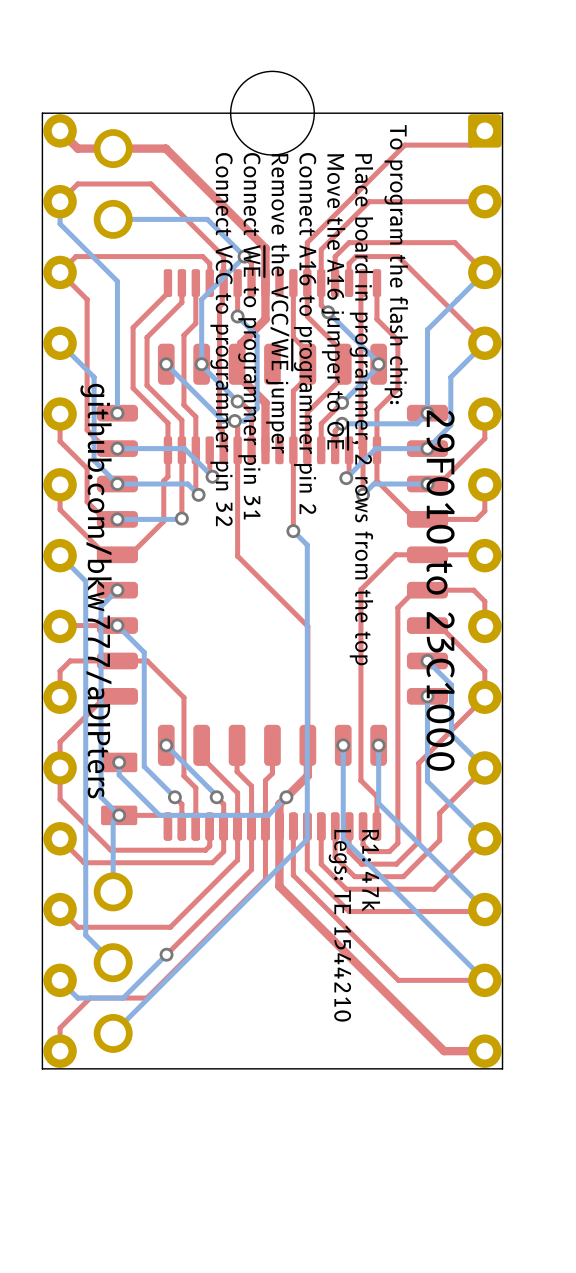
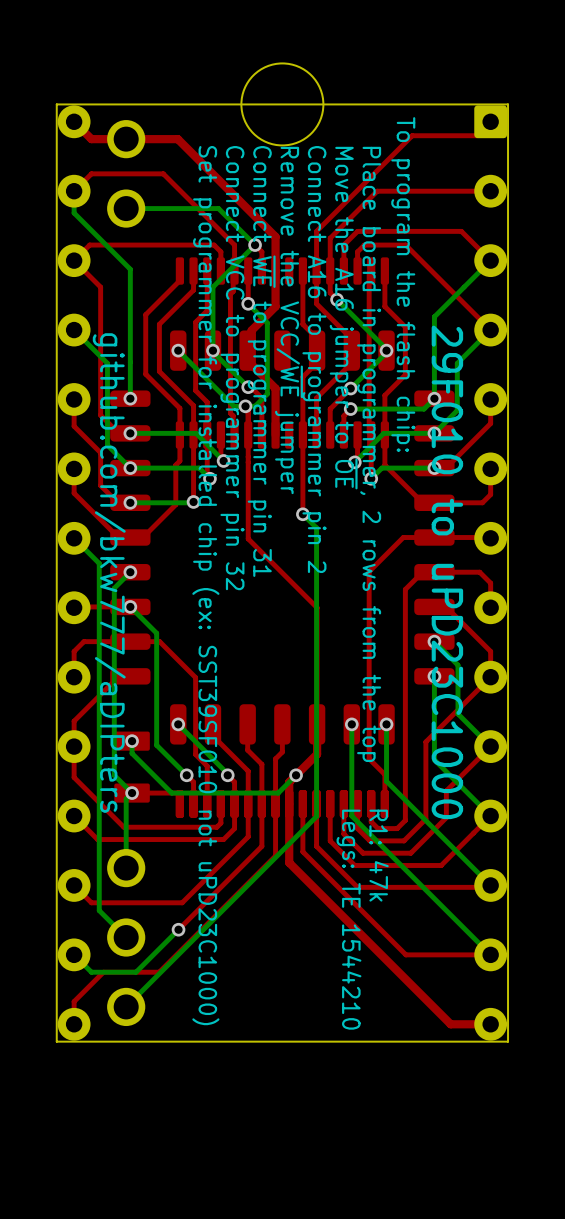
text: none -> Set programmer for installed chip (ex: SST39SF010 not uPD23C1000) (205, 585)
text: 29F010 to 23C1000 (440, 590) -> 29F010 to uPD23C1000 (447, 572)

